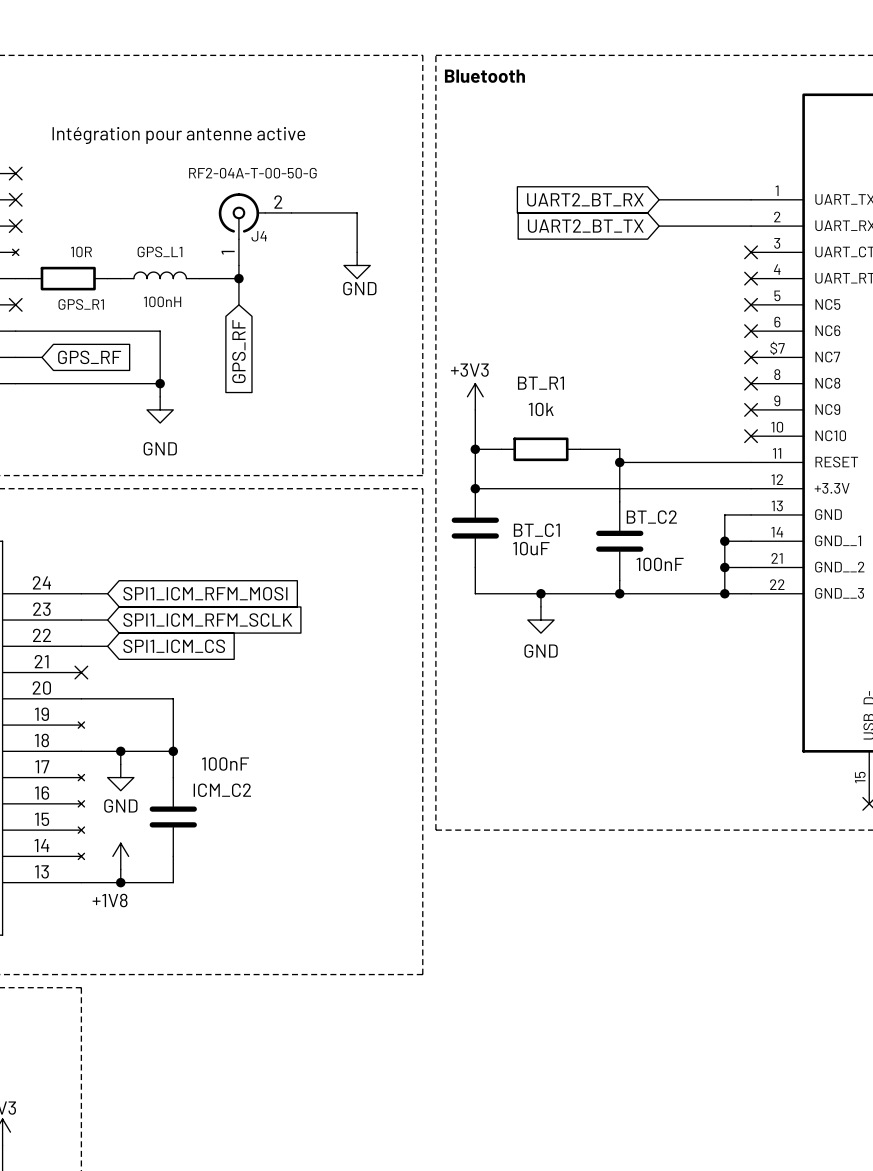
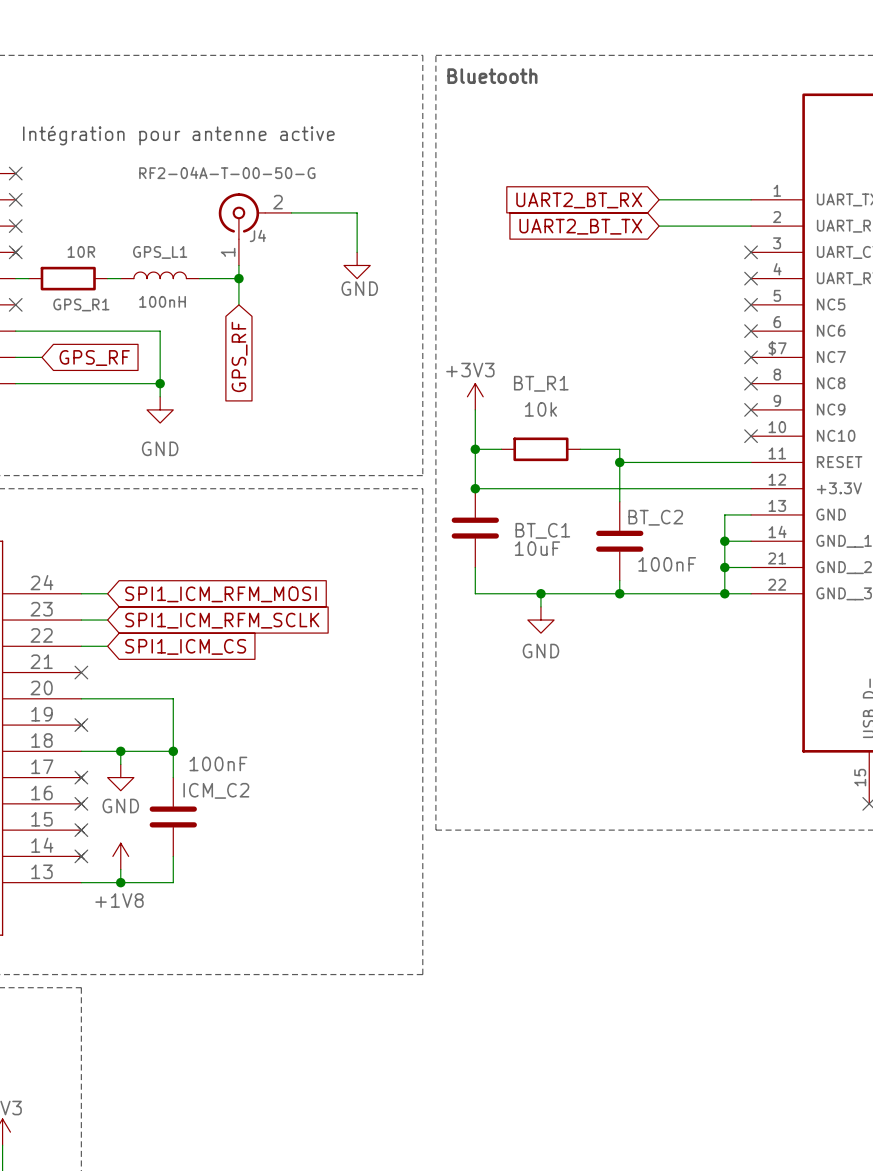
no-connect mark: none -> (15, 252)
no-connect mark: none -> (81, 725)
no-connect mark: none -> (81, 777)
no-connect mark: none -> (81, 803)
no-connect mark: none -> (81, 830)
no-connect mark: none -> (81, 856)

